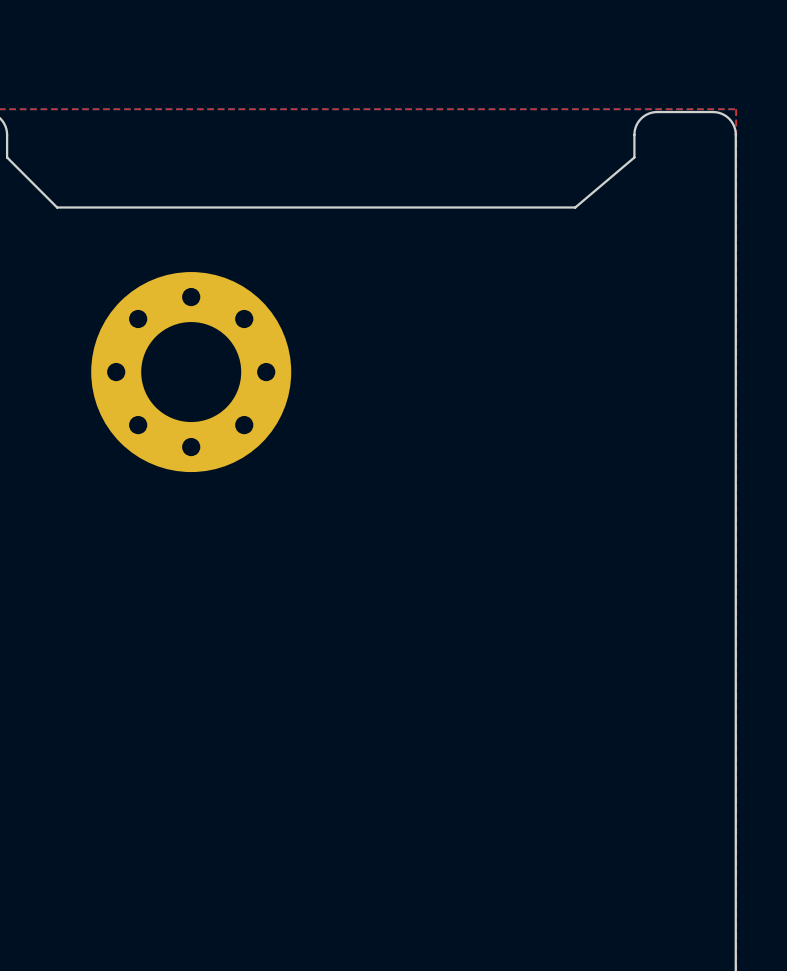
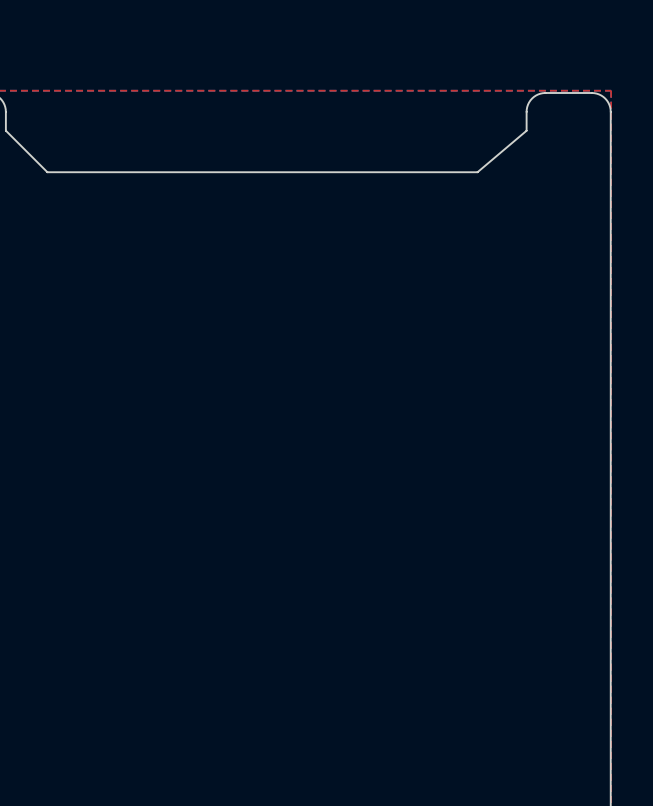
part: (191, 372) -> none

